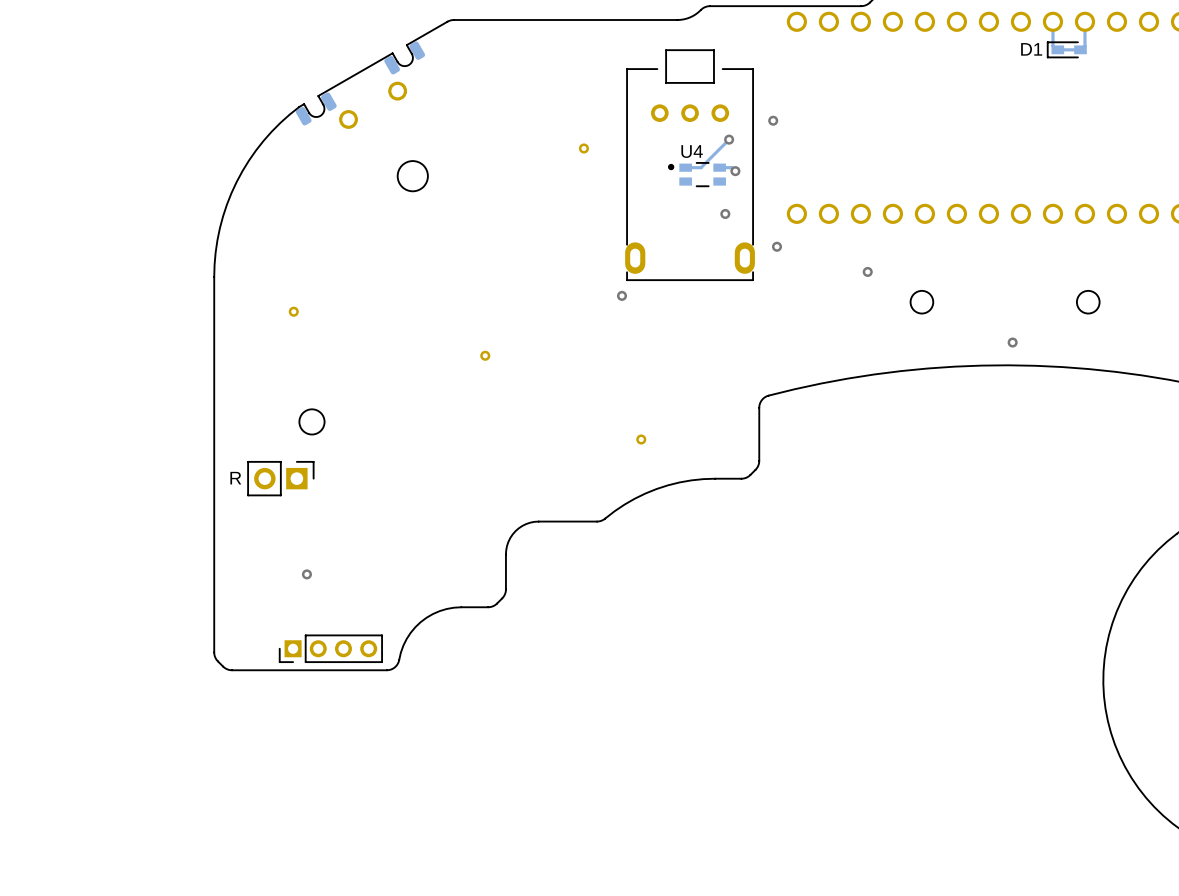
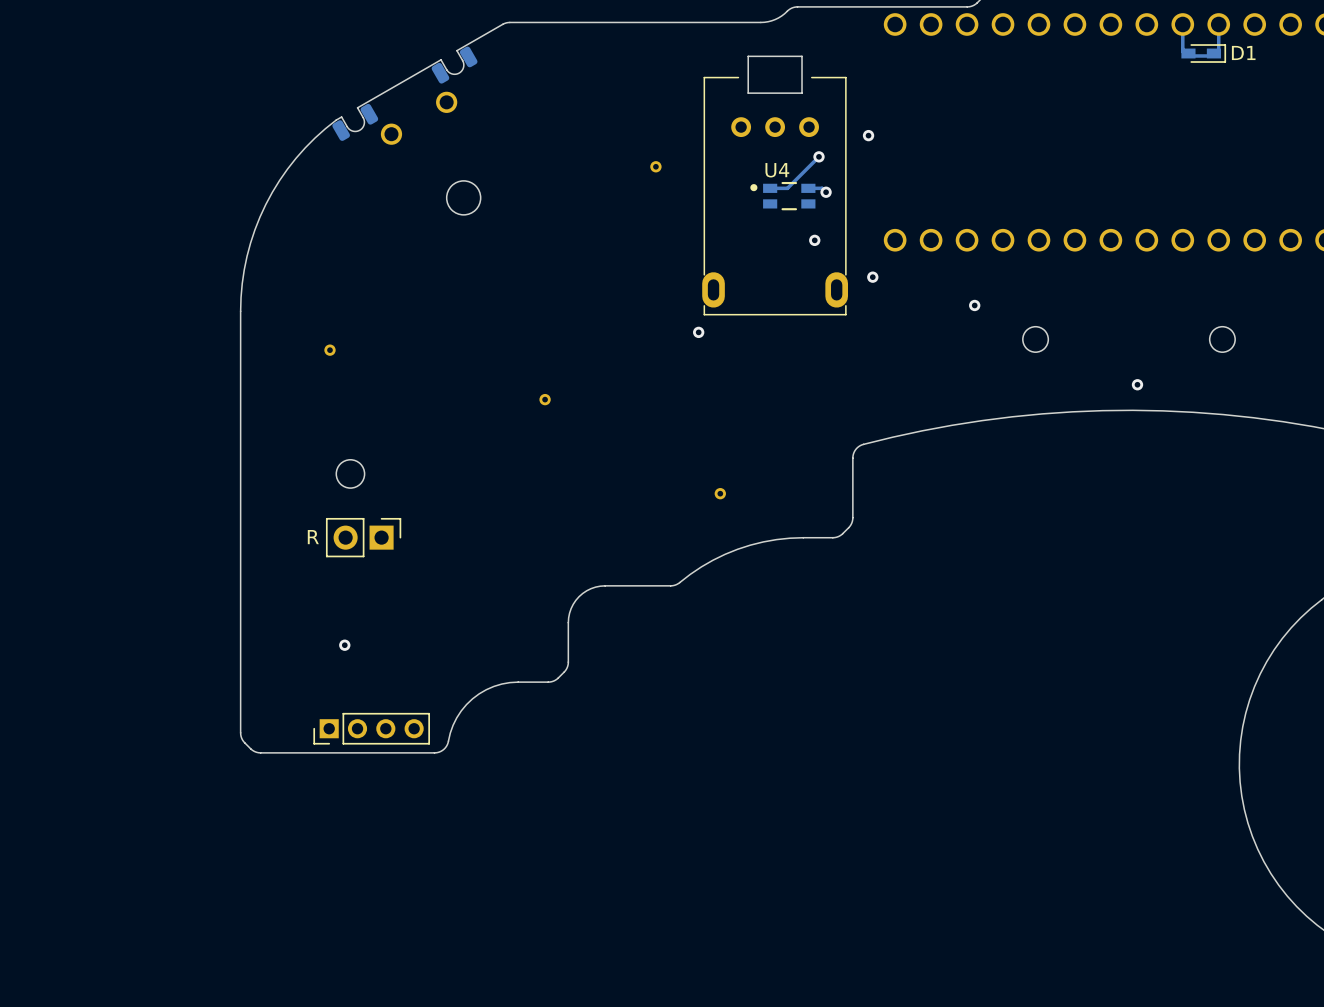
D1 rotation: 0° (1066, 49) -> 180° (1203, 53)
part position: (280, 478) -> (363, 537)

